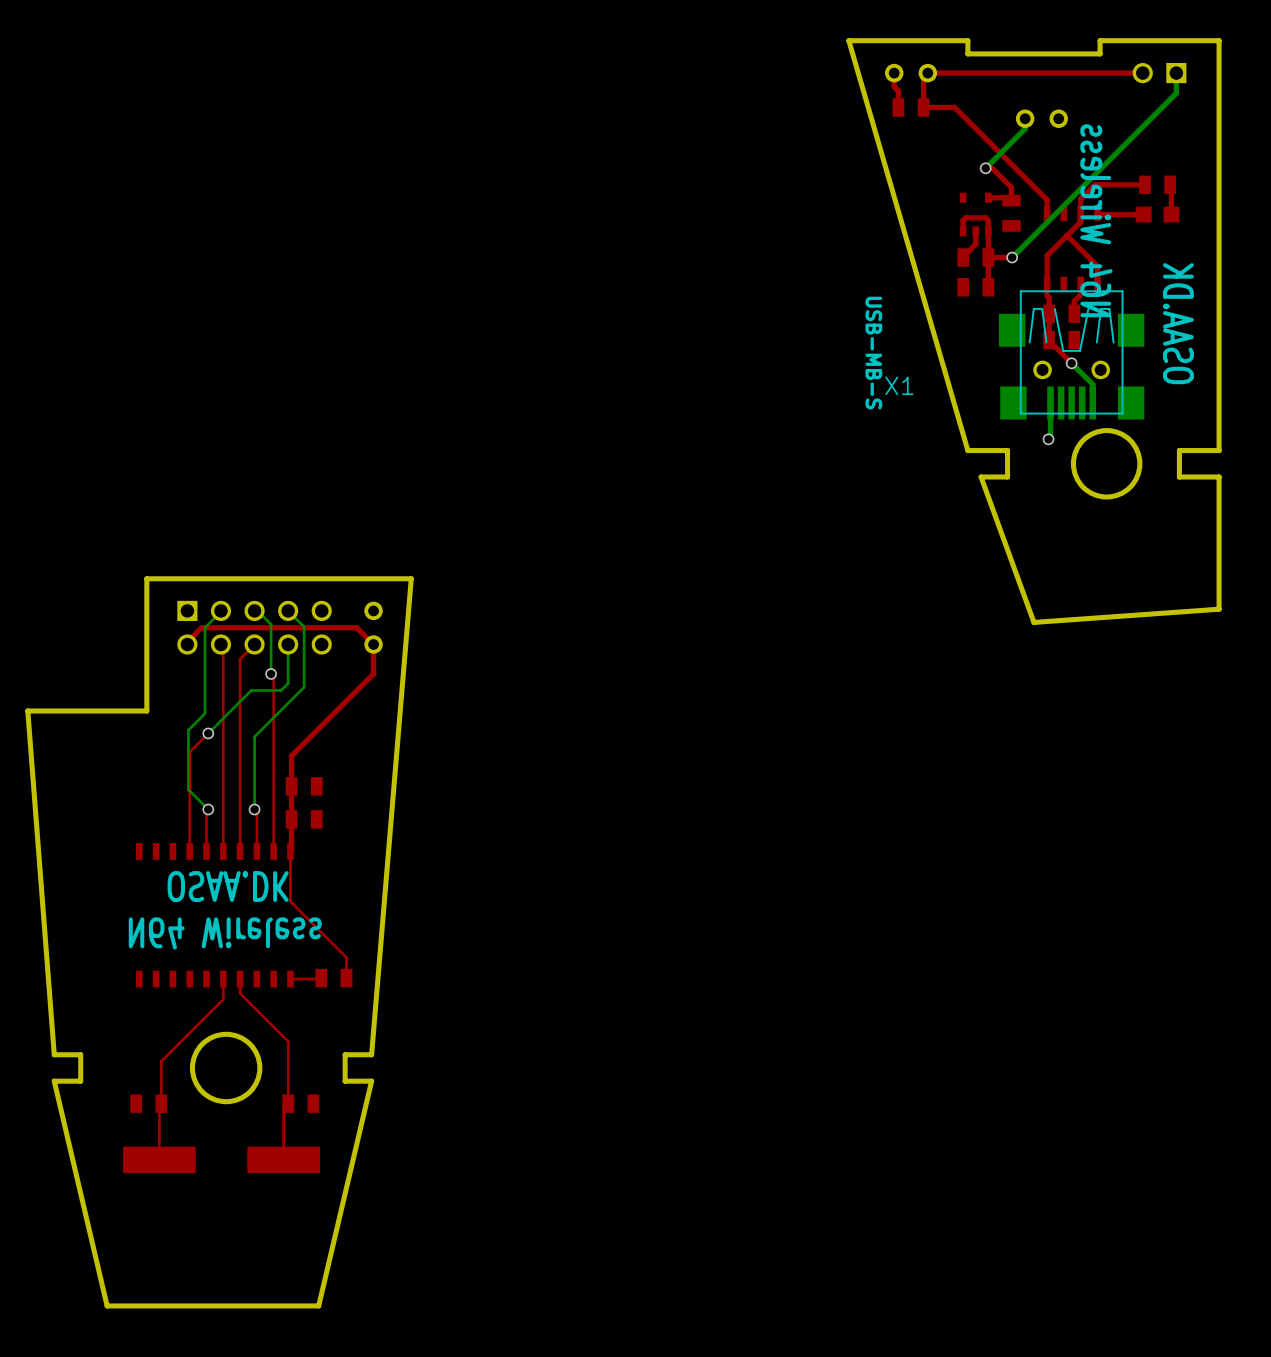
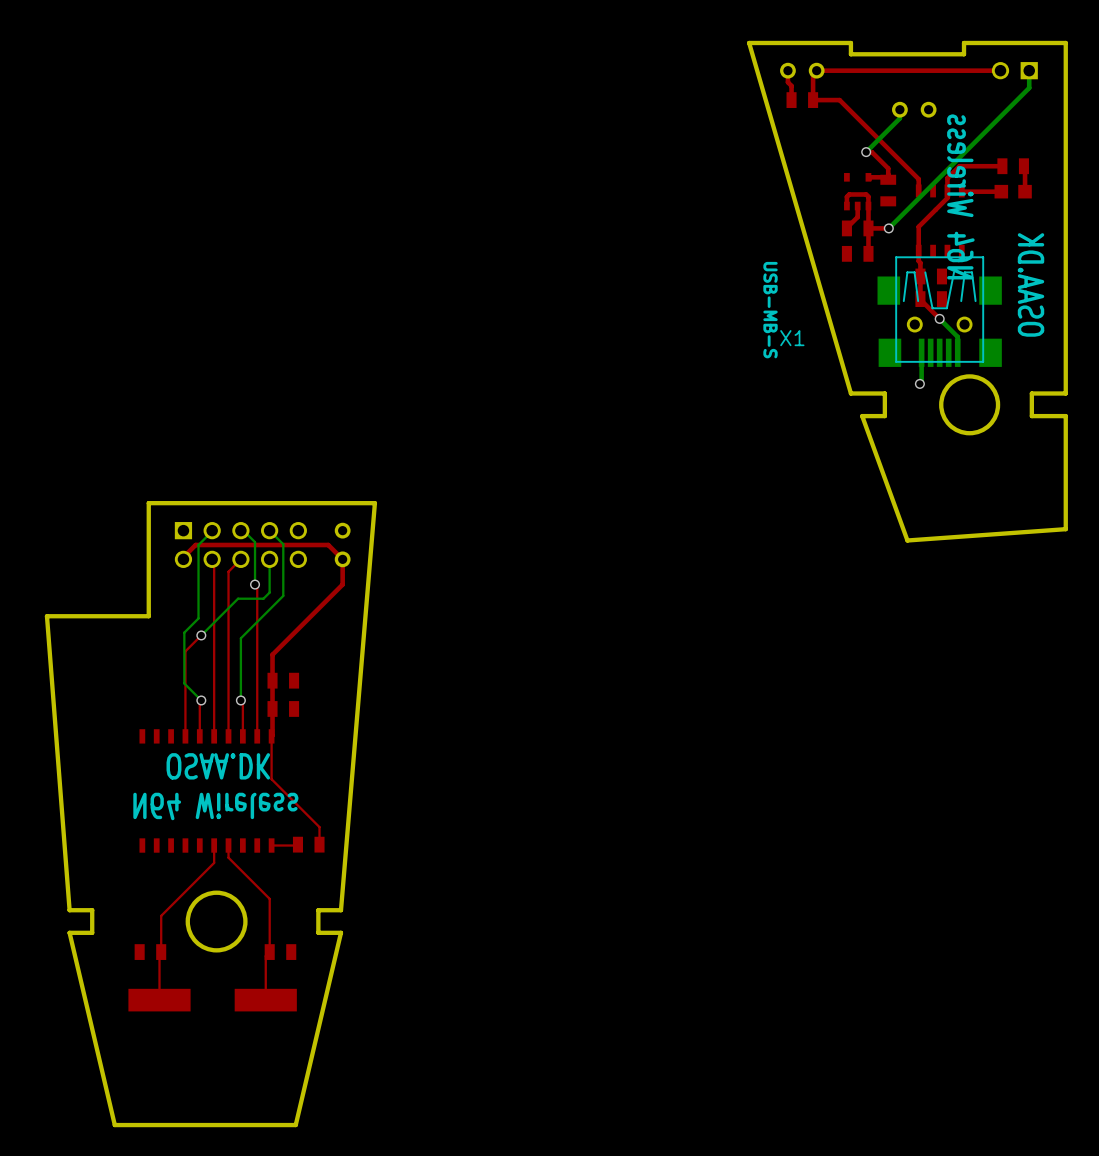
top track: (1067, 235) (1097, 266) (1097, 284) -> none
top track: (1080, 284) (1080, 294) (1074, 301) (1074, 313) -> none

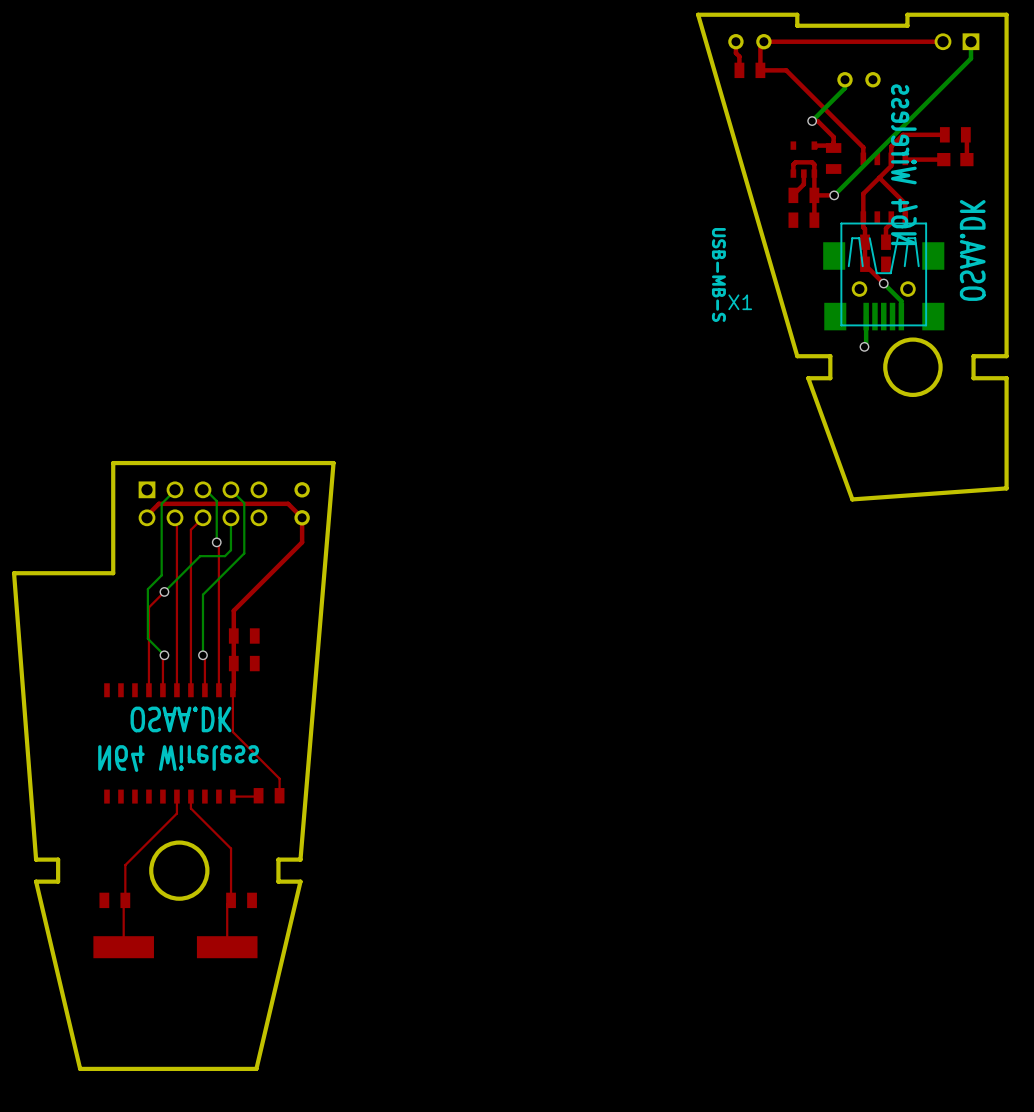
top track: none -> (879, 177) (905, 203) (905, 217)
top track: none -> (891, 217) (891, 223) (885, 228) (885, 242)

